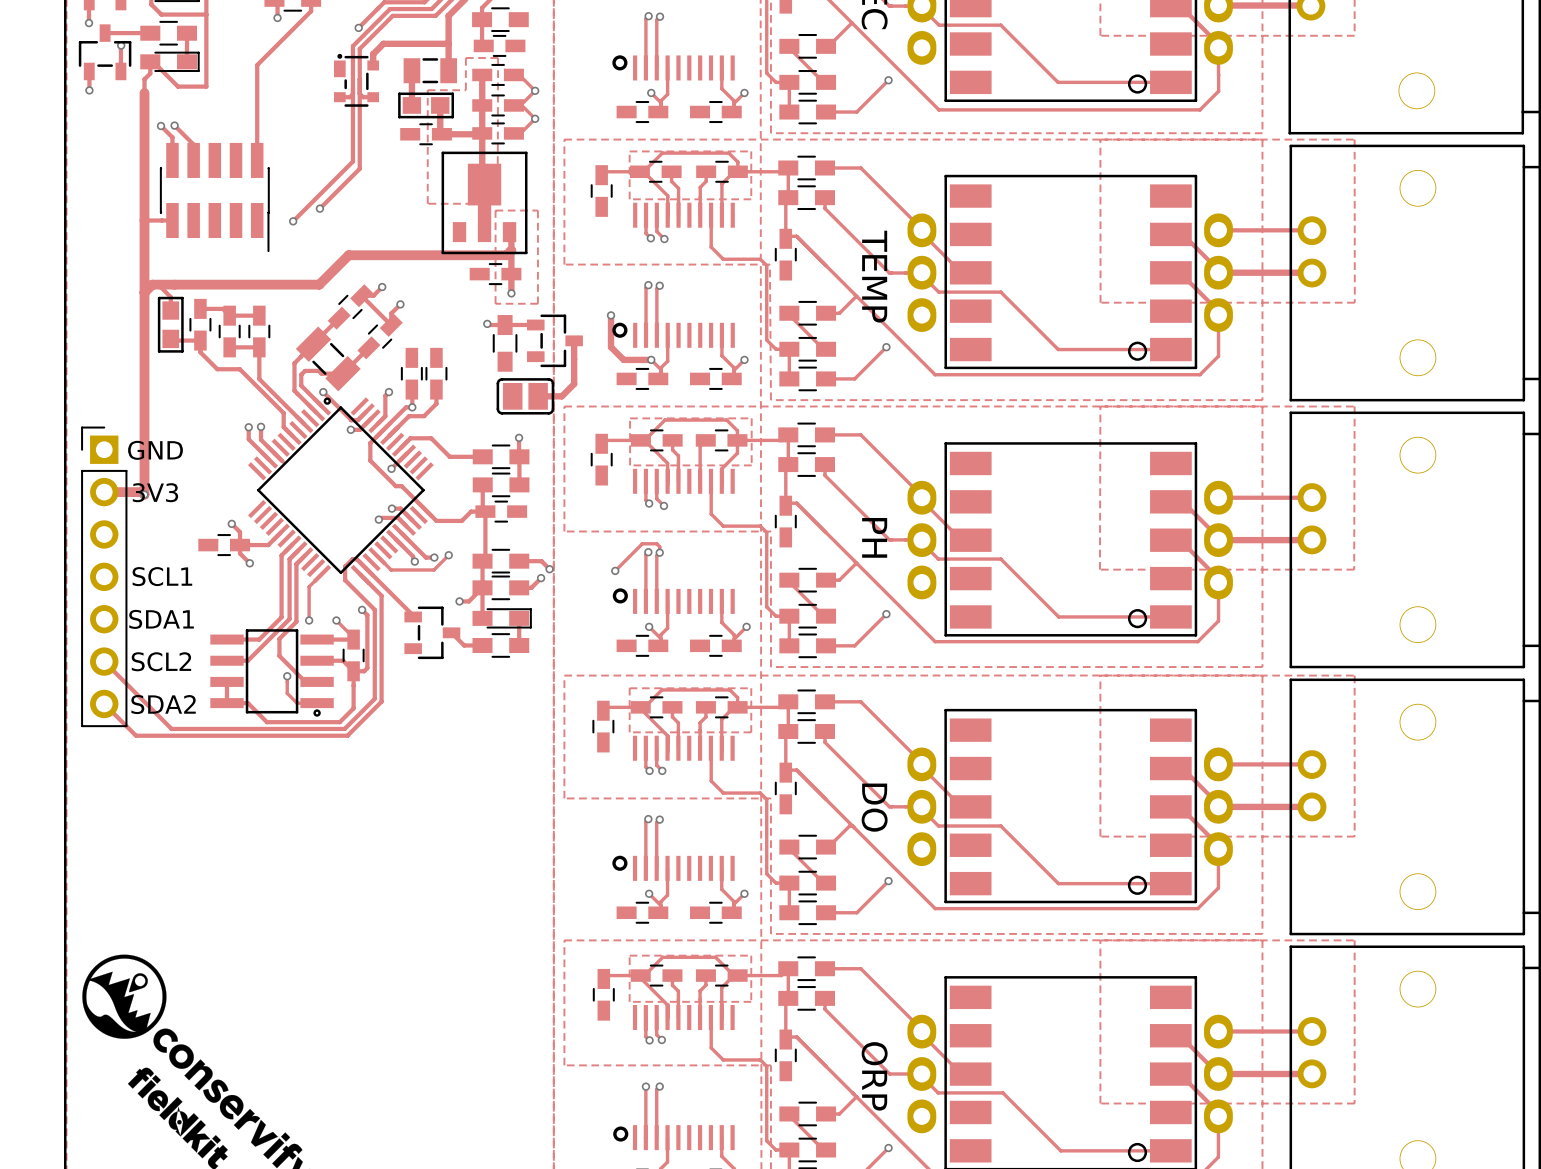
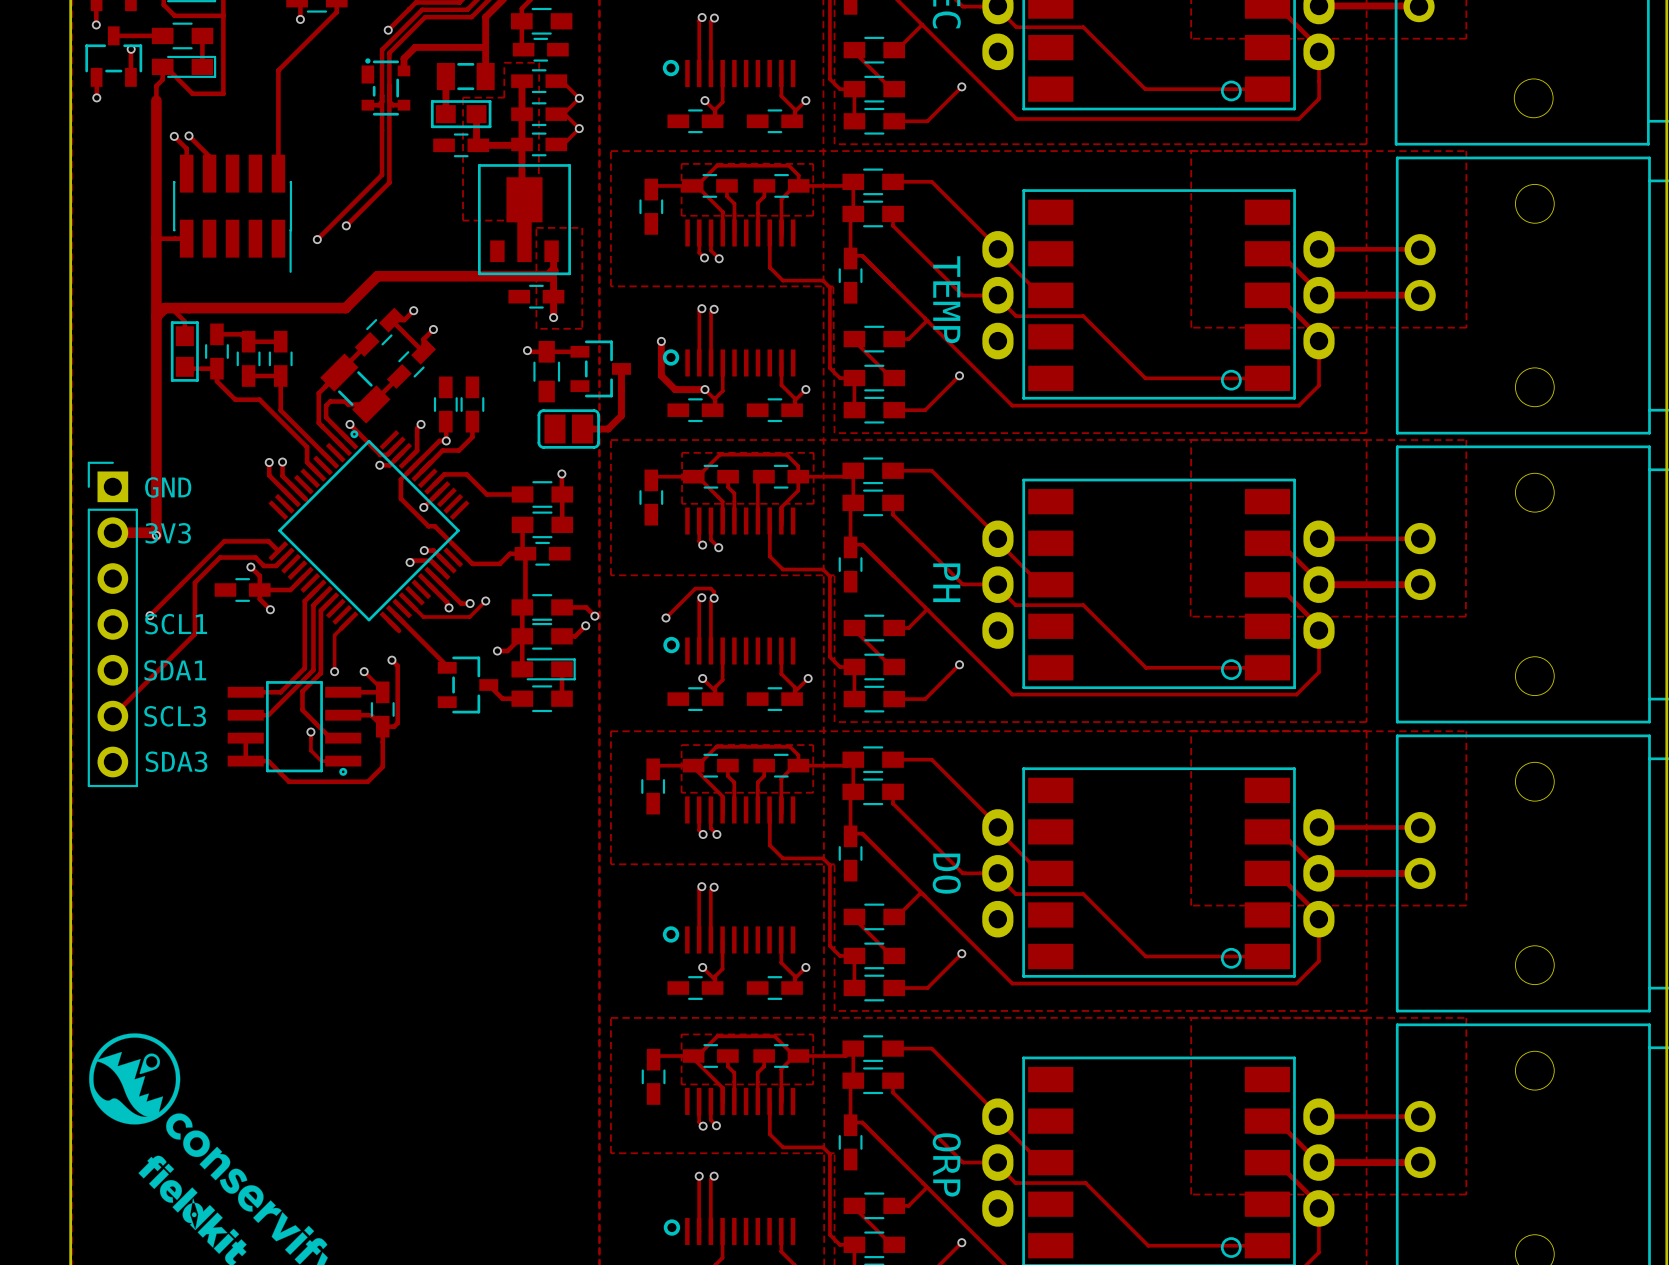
track: none -> (278, 551) (268, 541) (224, 541) (150, 615)
via: none -> (150, 615)
track: (365, 568) (356, 559) (352, 559) (345, 566) (345, 580) (374, 609) (374, 698) (344, 728) (171, 728) (104, 661) -> (284, 557) (276, 565) (263, 565) (255, 557) (220, 557) (194, 582) (194, 634) (112, 716)
track: (368, 582) (381, 595) (381, 701) (347, 735) (136, 735) (104, 703) -> none
text: SCL2 (161, 661) -> SCL3 (175, 716)
text: SDA2 (163, 704) -> SDA3 (176, 761)

